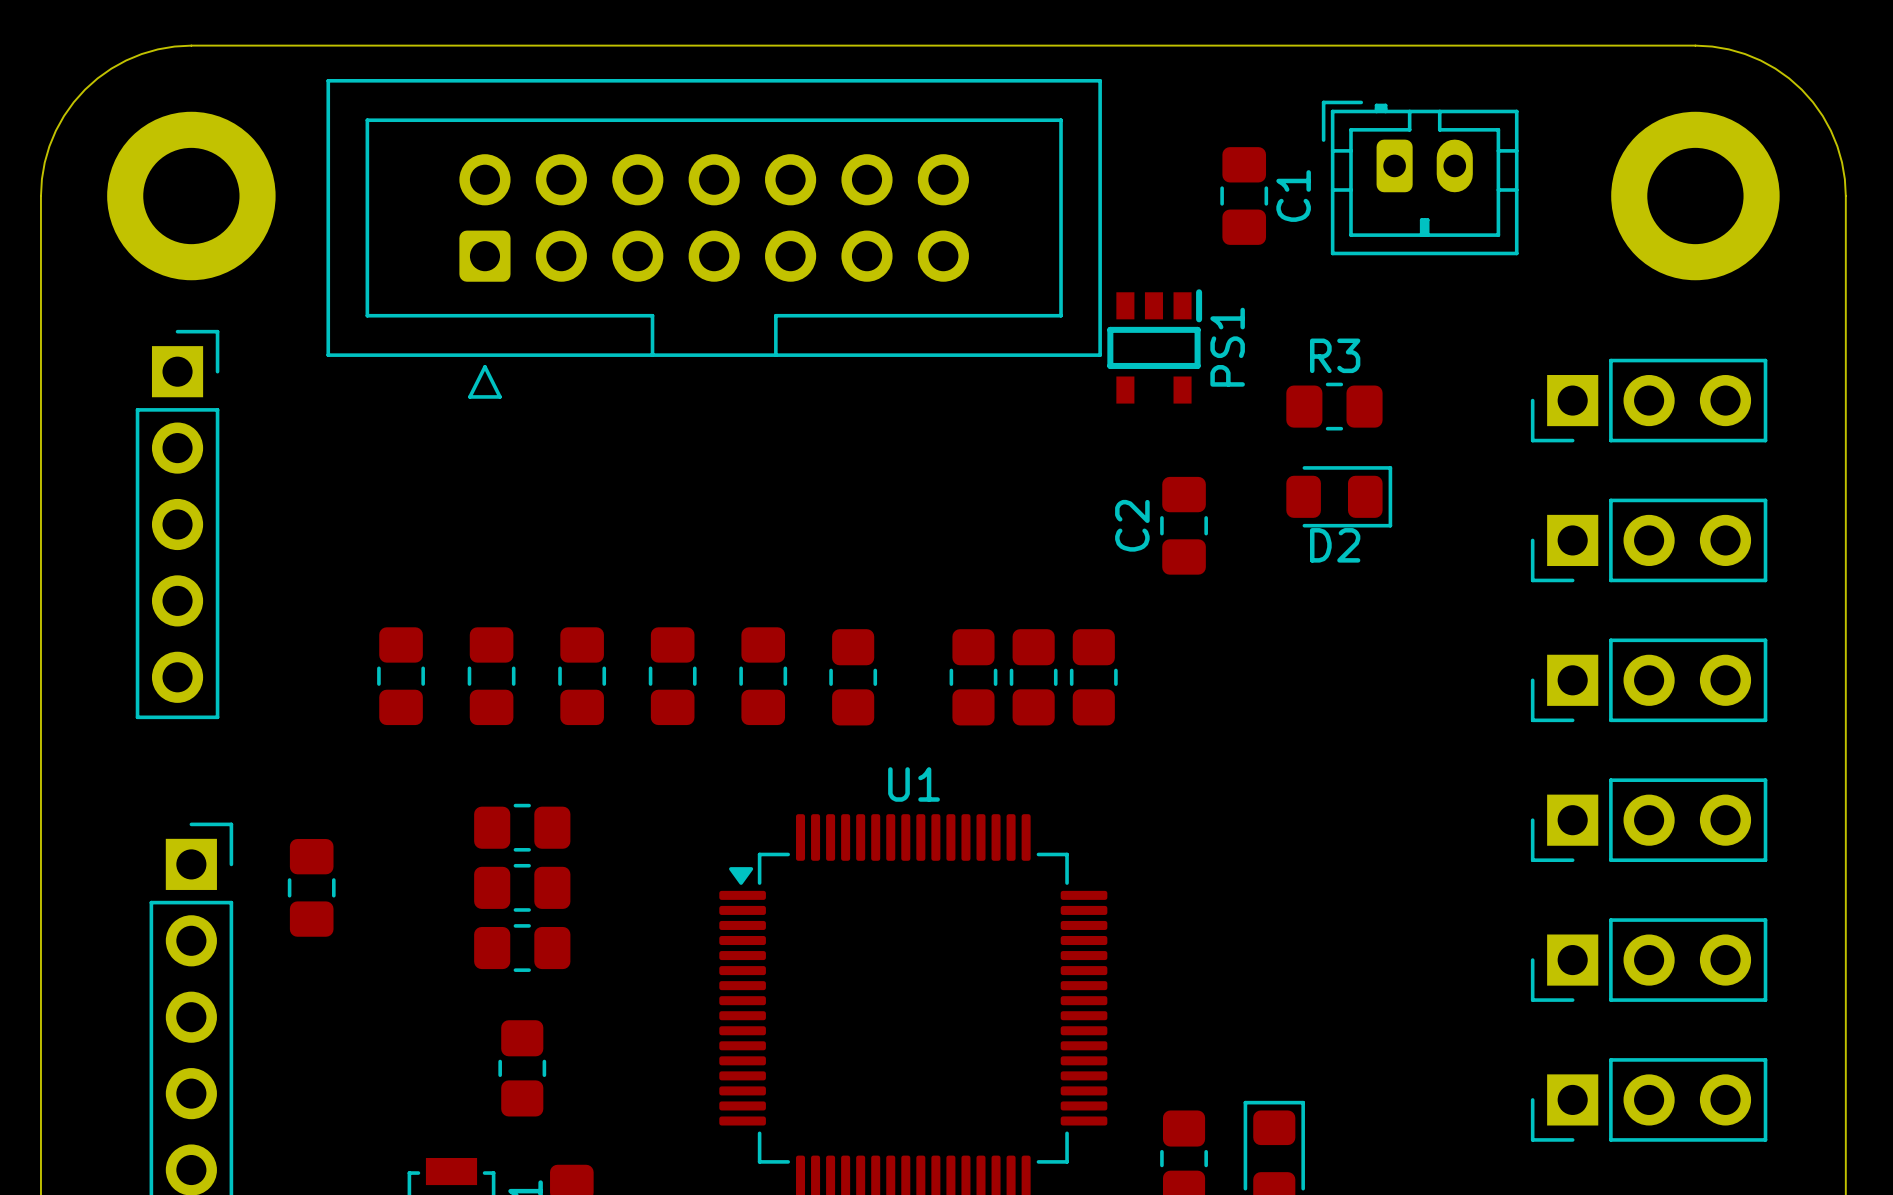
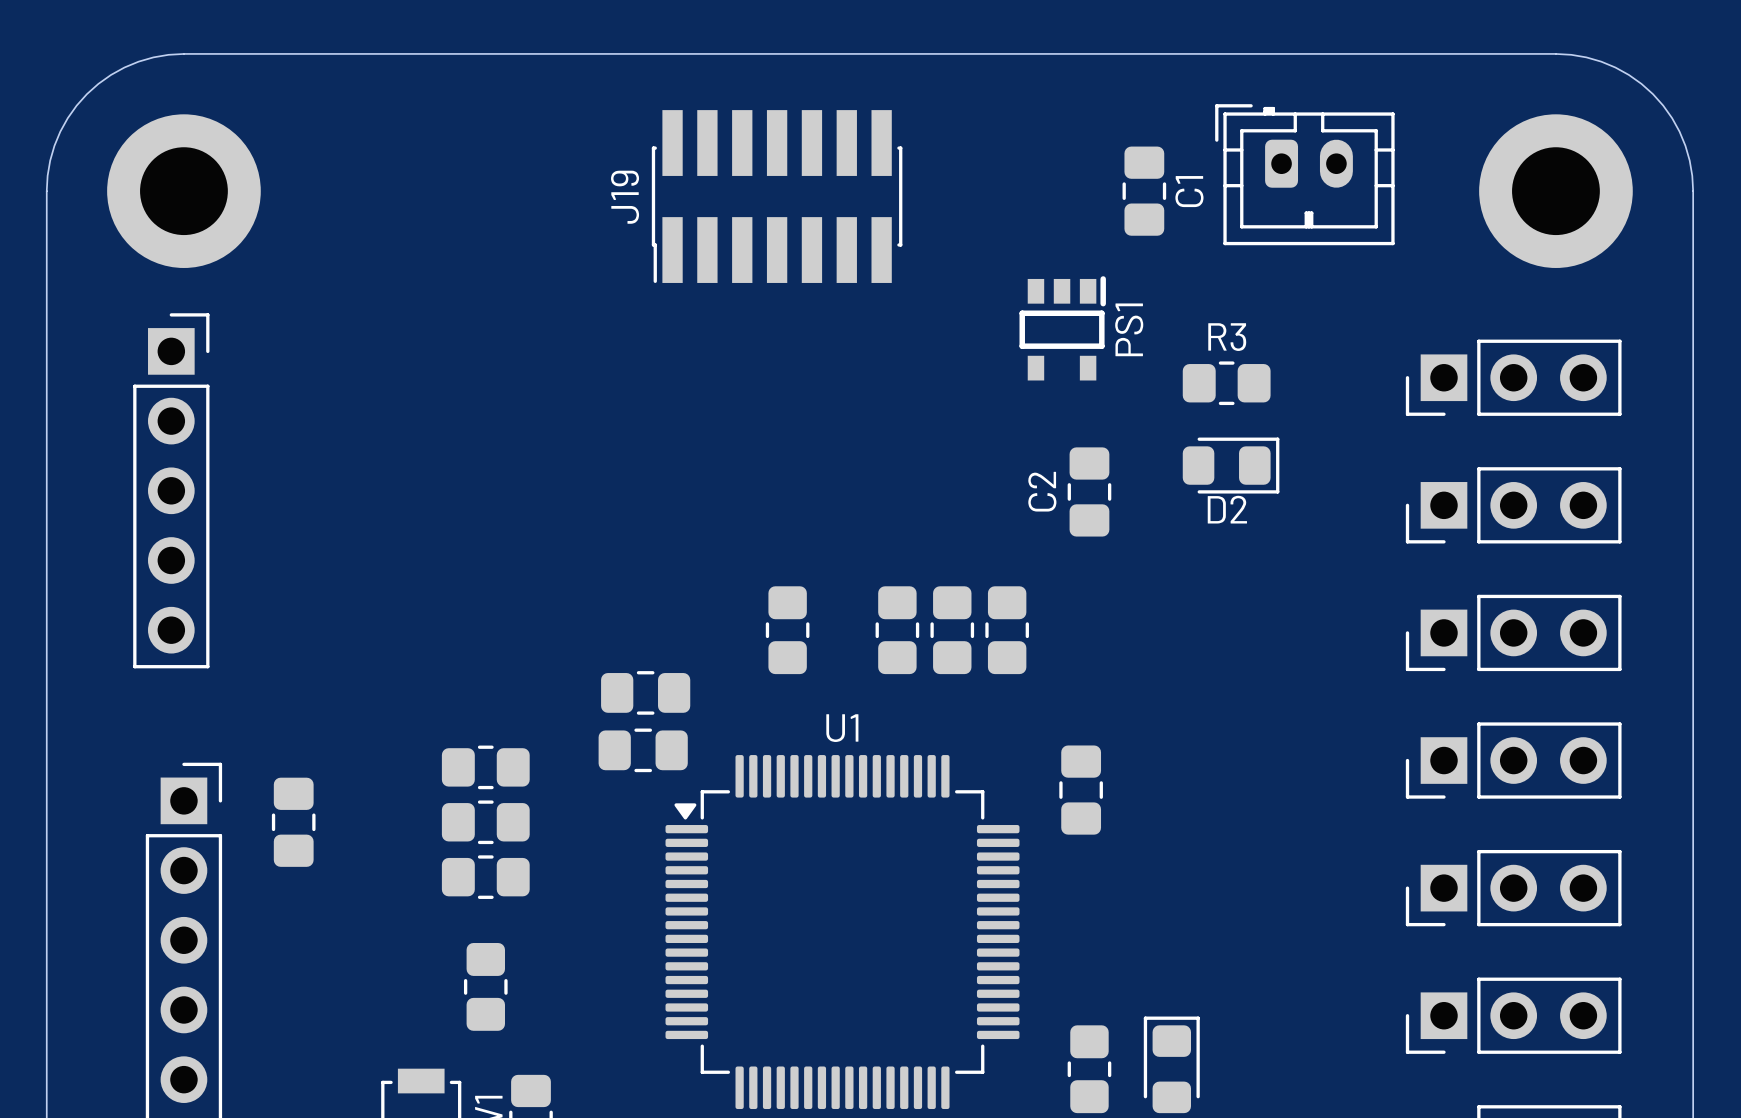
J19: none -> (777, 196)
part: (714, 238) -> none
part: (401, 676) -> none
part: (491, 676) -> none
part: (582, 676) -> none
part: (672, 676) -> none
part: (763, 676) -> none
part: none -> (645, 692)
part: none -> (643, 750)
part: none -> (1081, 790)

